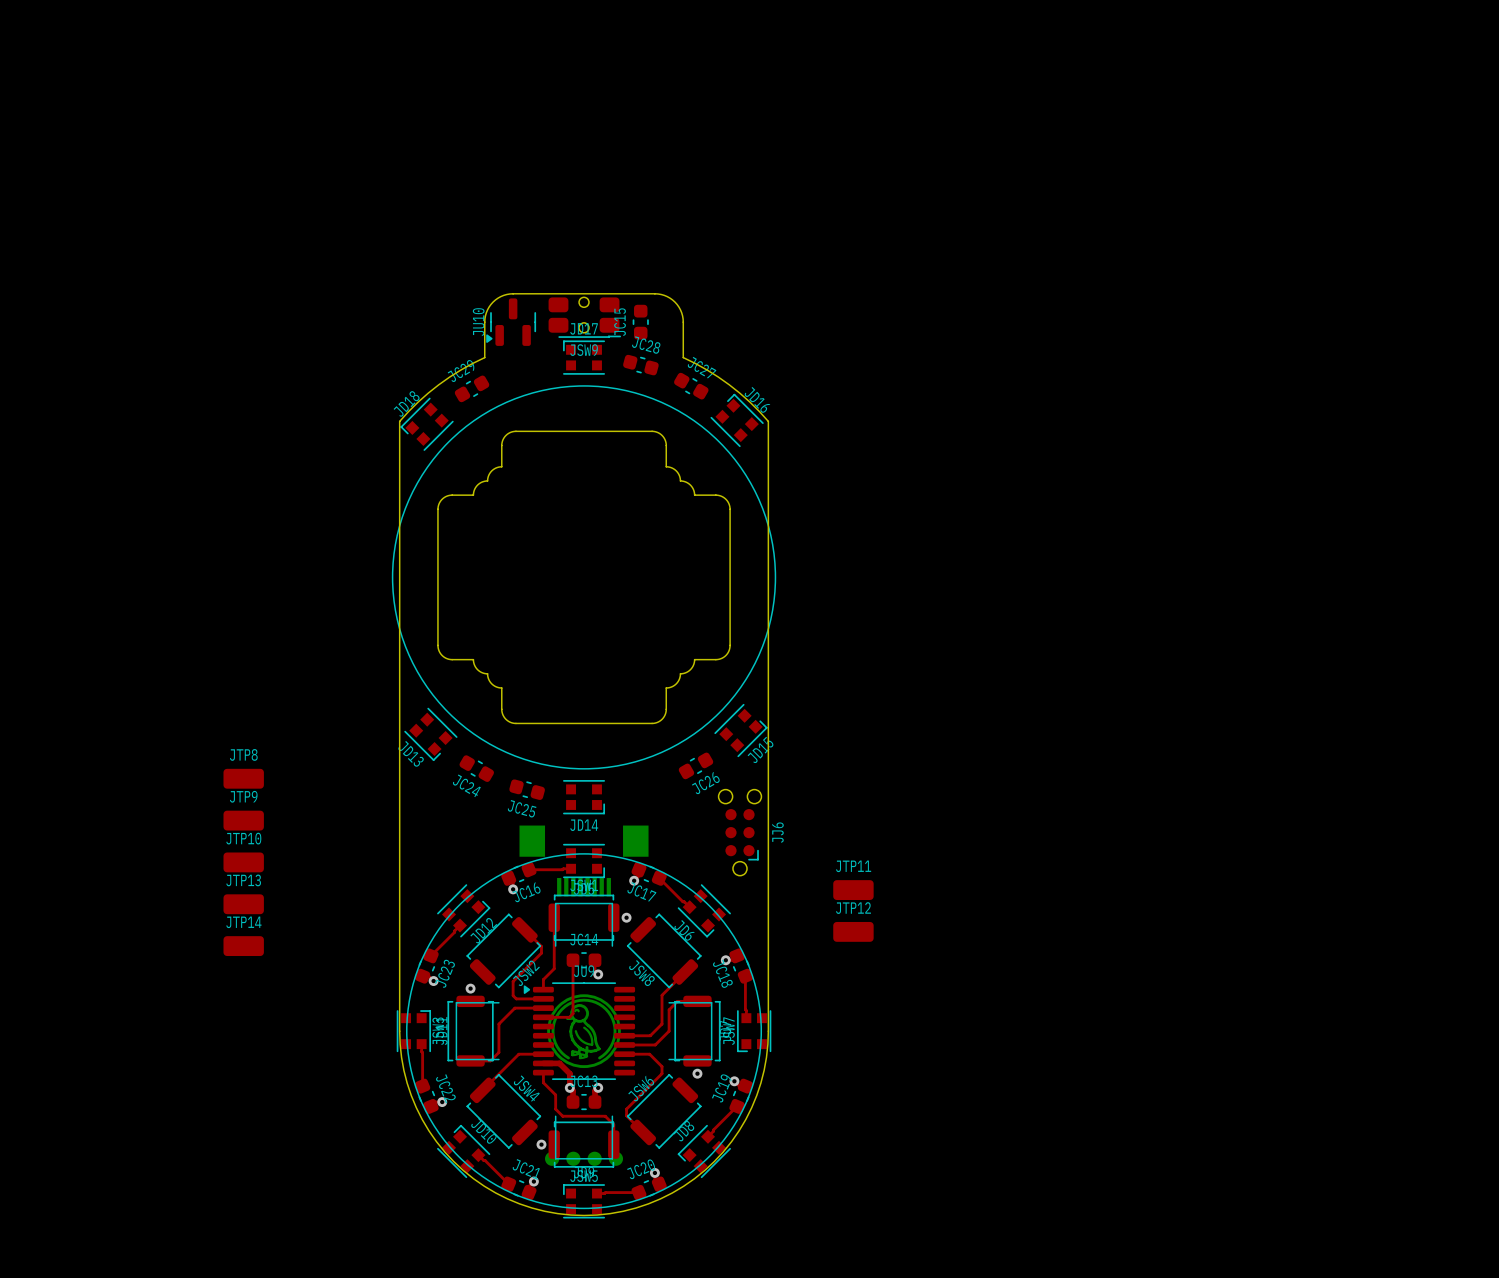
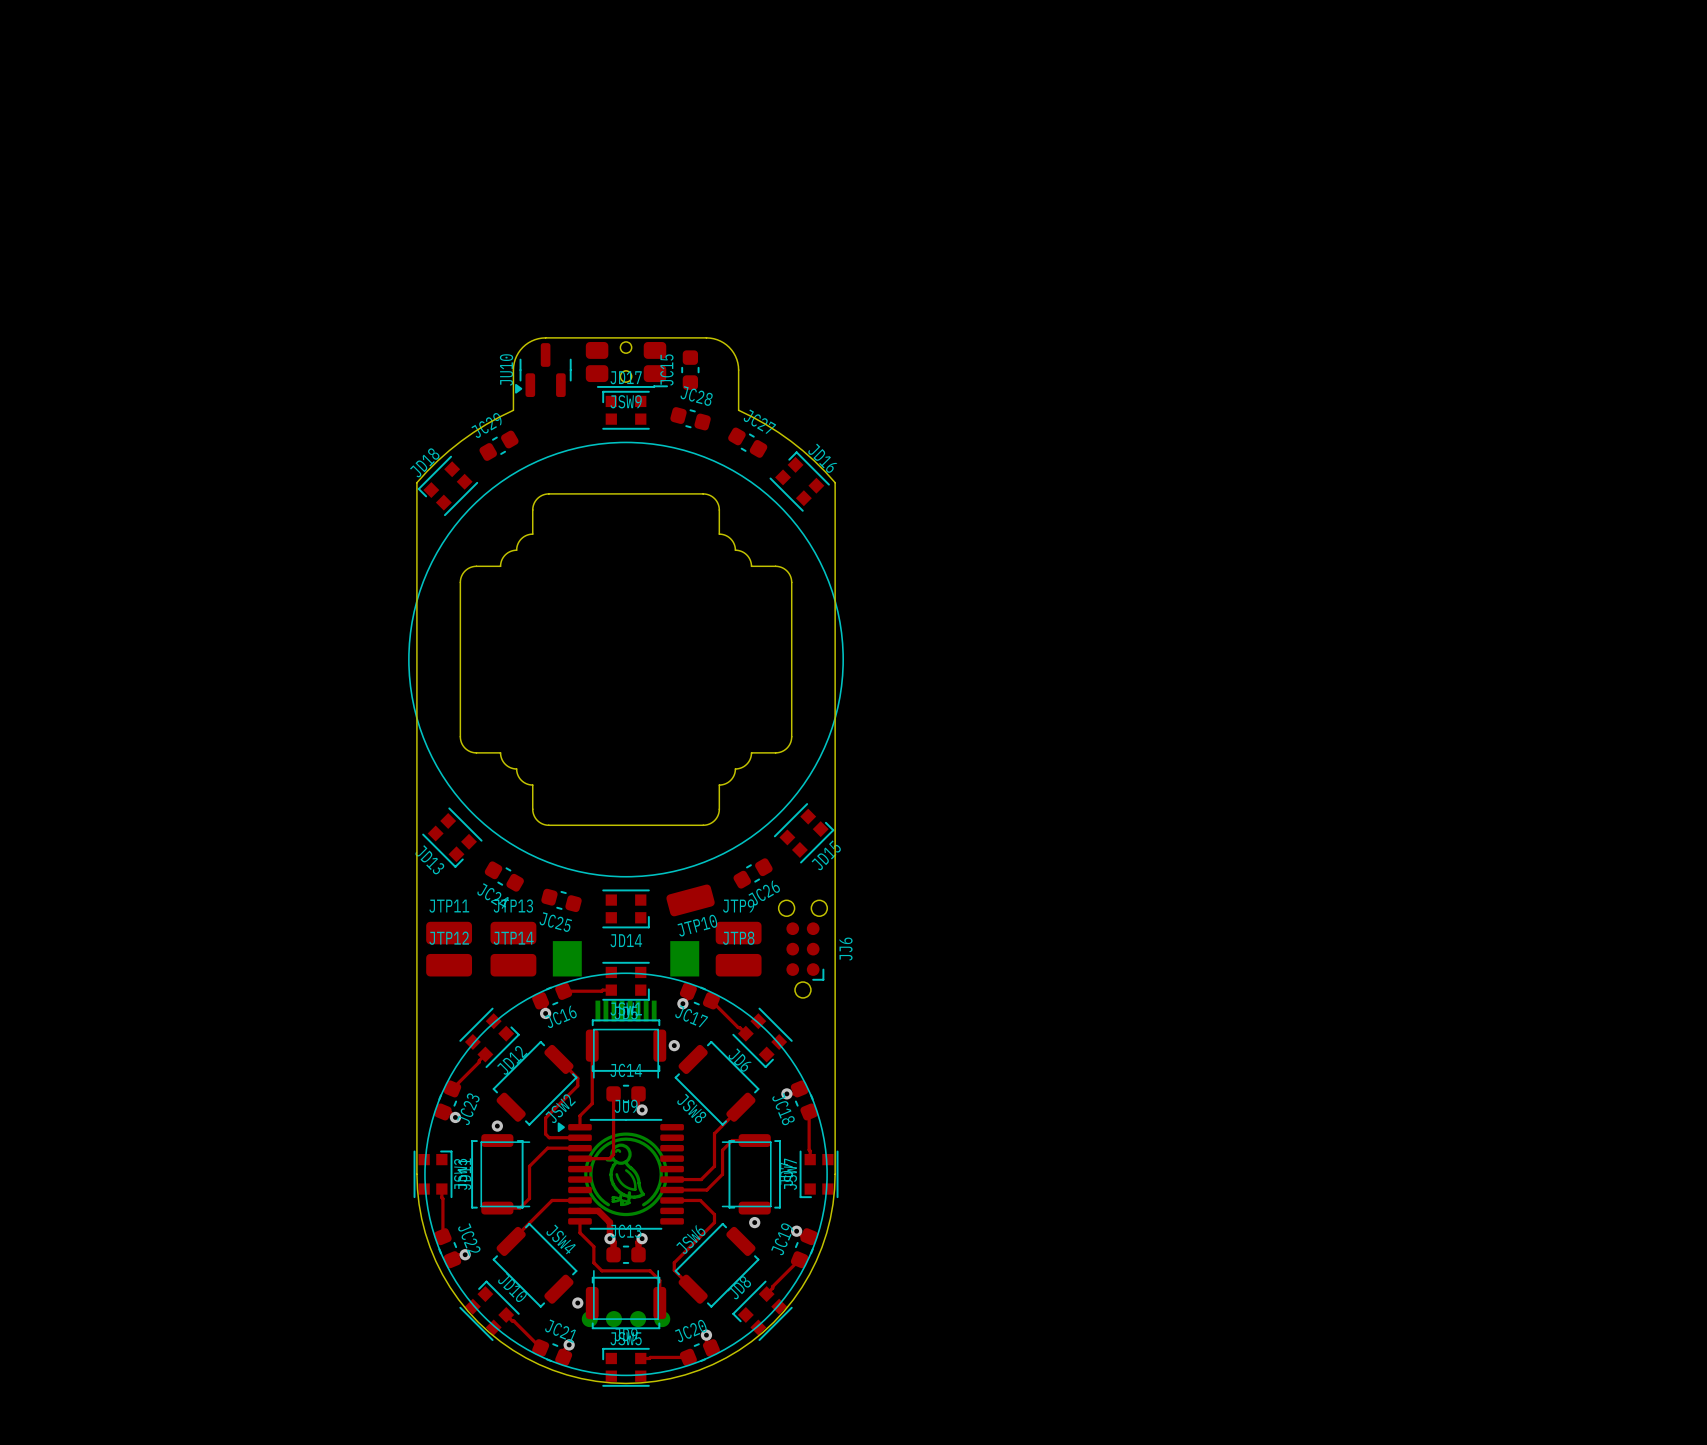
JTP8 position: (243, 778) -> (738, 965)
JTP9 position: (243, 820) -> (738, 933)
JTP10 name position: JTP10 (243, 838) -> JTP10 (697, 925)
JTP10 rotation: 0° (243, 862) -> 15° counterclockwise (690, 900)
JTP10 position: (243, 862) -> (690, 900)
JTP11 position: (853, 890) -> (449, 933)
JTP13 position: (243, 904) -> (513, 933)
JTP12 position: (853, 931) -> (449, 965)
JTP14 position: (243, 946) -> (513, 965)

